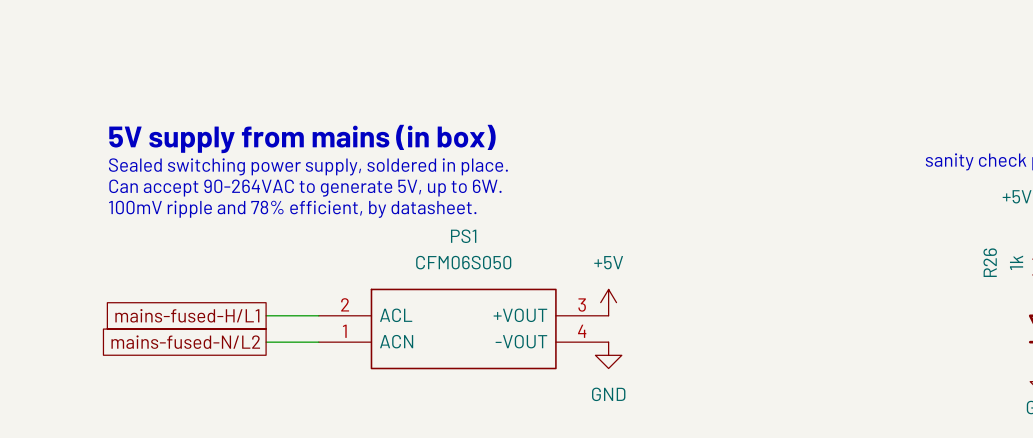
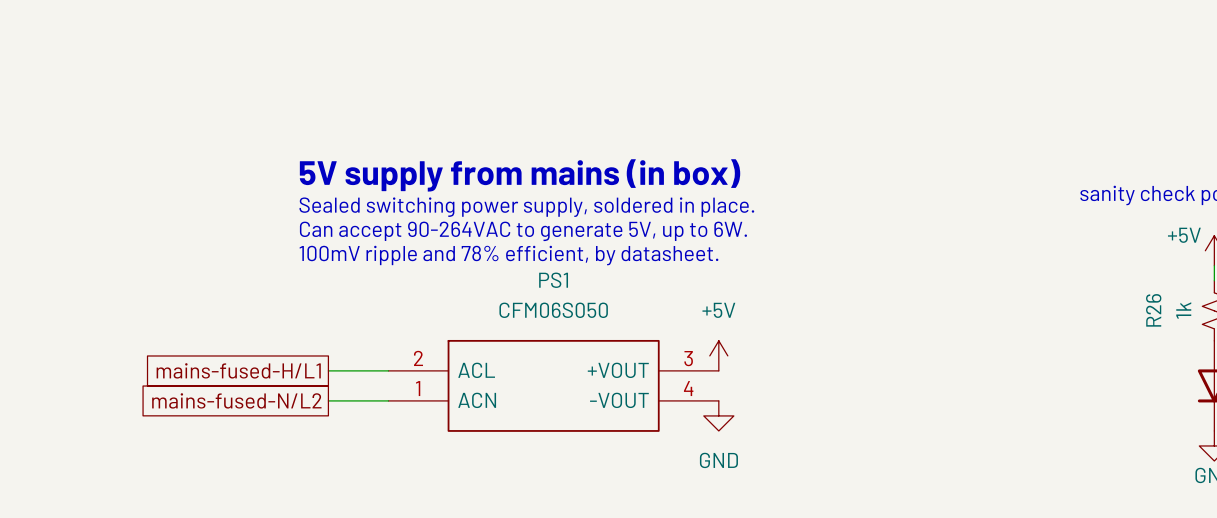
text position: 5V supply from mains (in box) (302, 139) -> 5V supply from mains (in box) (520, 175)
text position: Sealed switching power supply, soldered in place. (308, 166) -> Sealed switching power supply, soldered in place. (526, 207)
text position: Can accept 90-264VAC to generate 5V, up to 6W. (305, 188) -> Can accept 90-264VAC to generate 5V, up to 6W. (523, 231)
text position: 100mV ripple and 78% efficient, by datasheet. (292, 209) -> 100mV ripple and 78% efficient, by datasheet. (508, 255)

